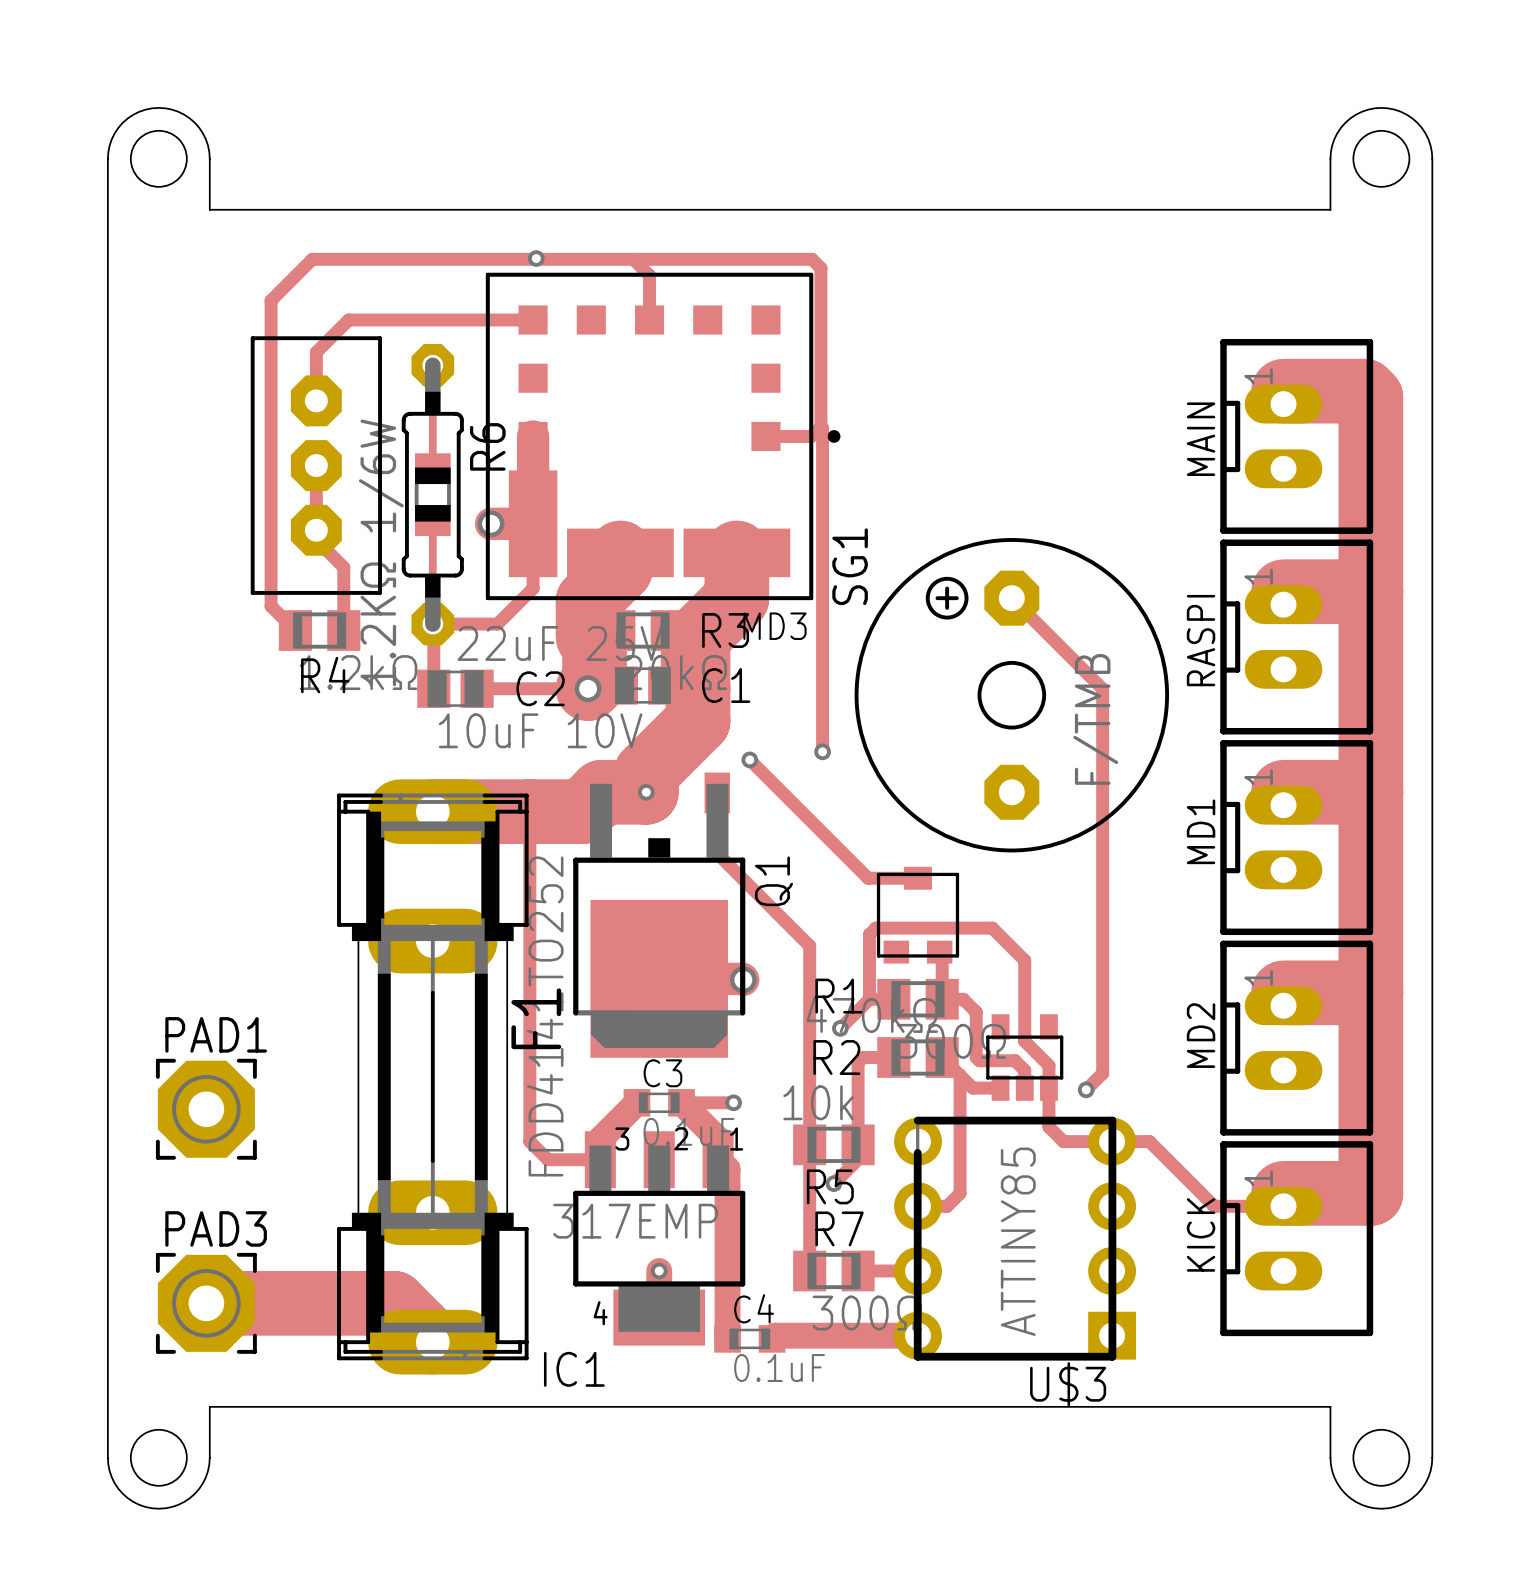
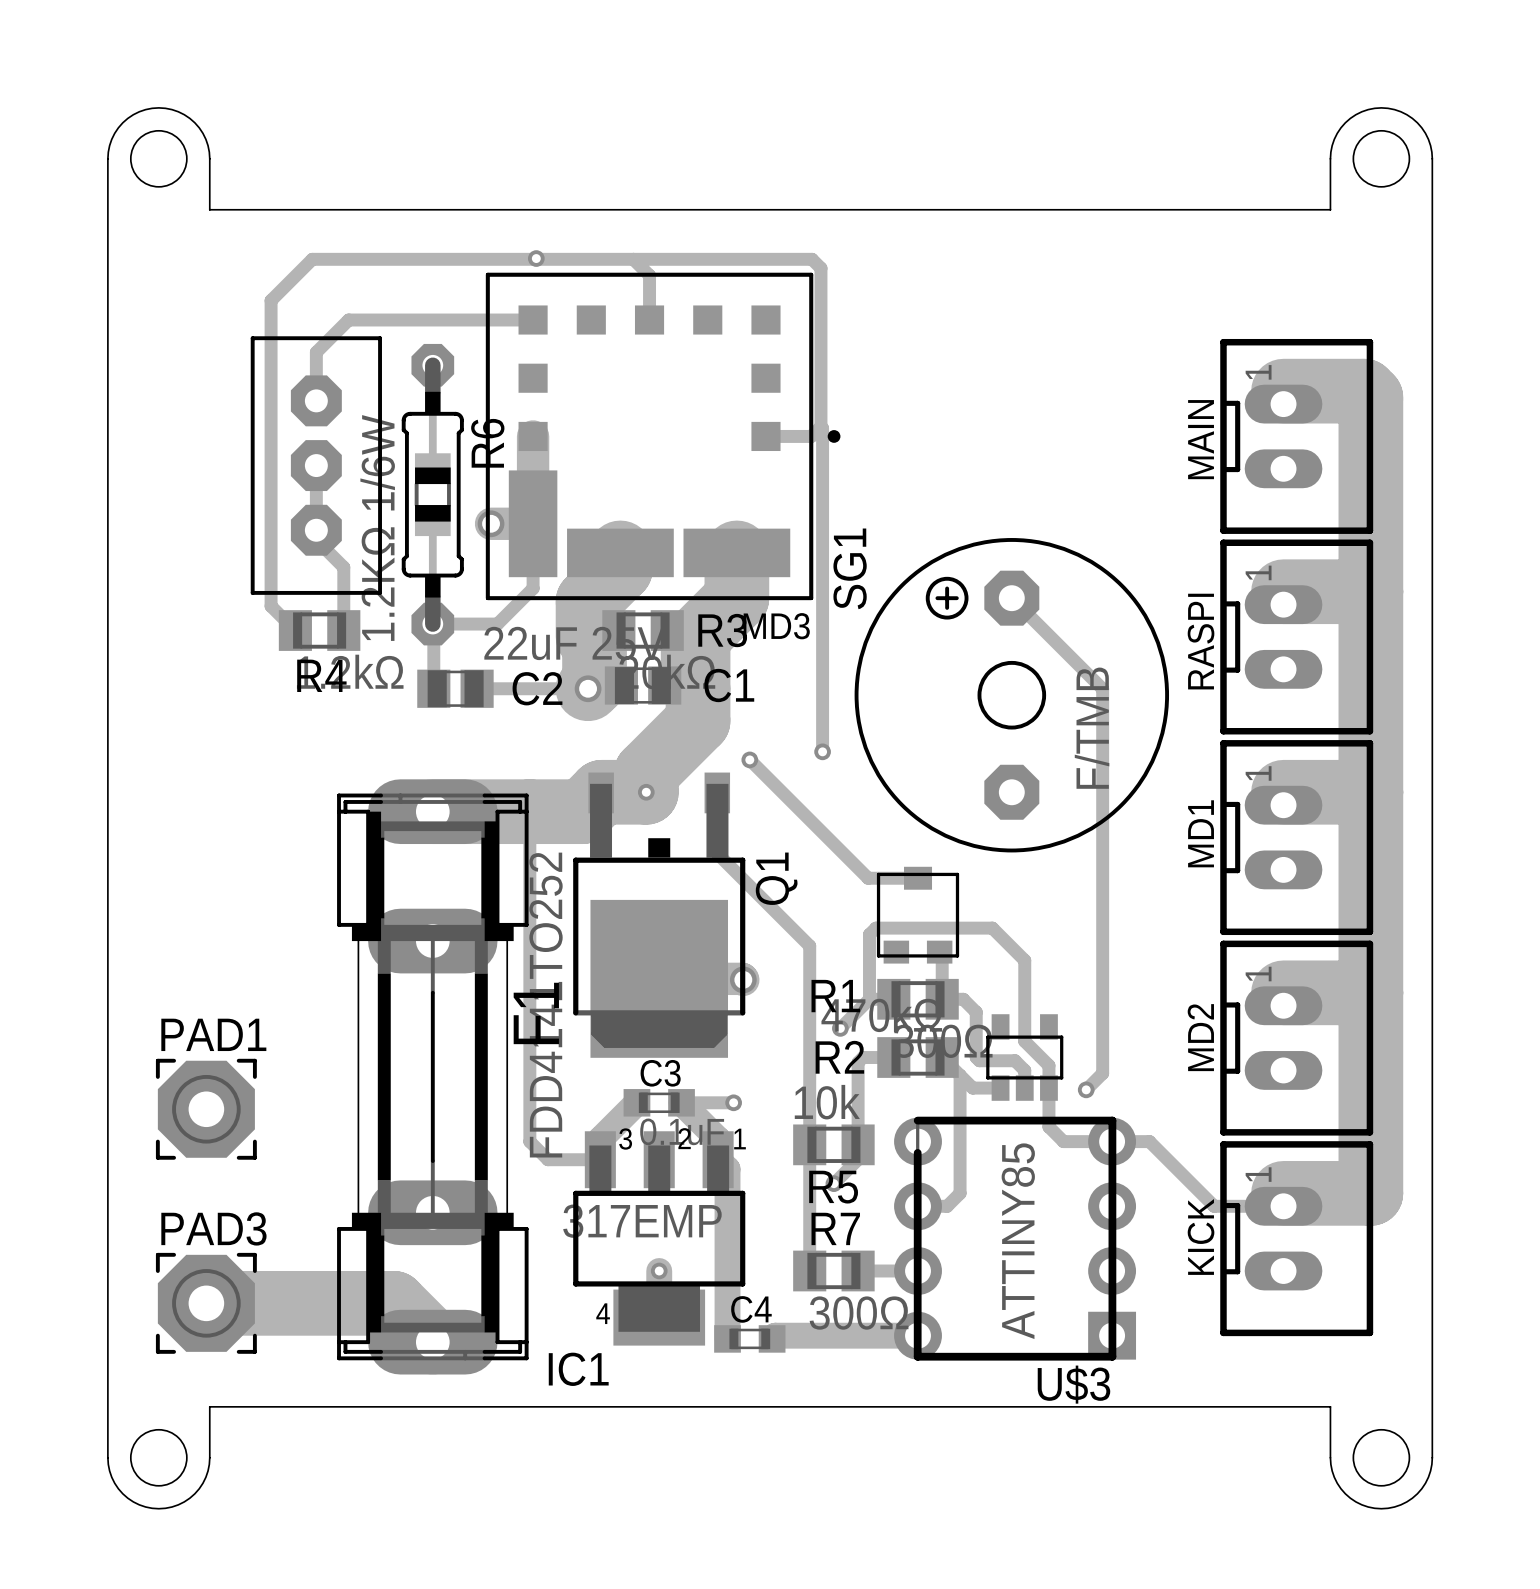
C2 value: 10uF 10V (540, 730) -> none
C4 value: 0.1uF (779, 1368) -> none

